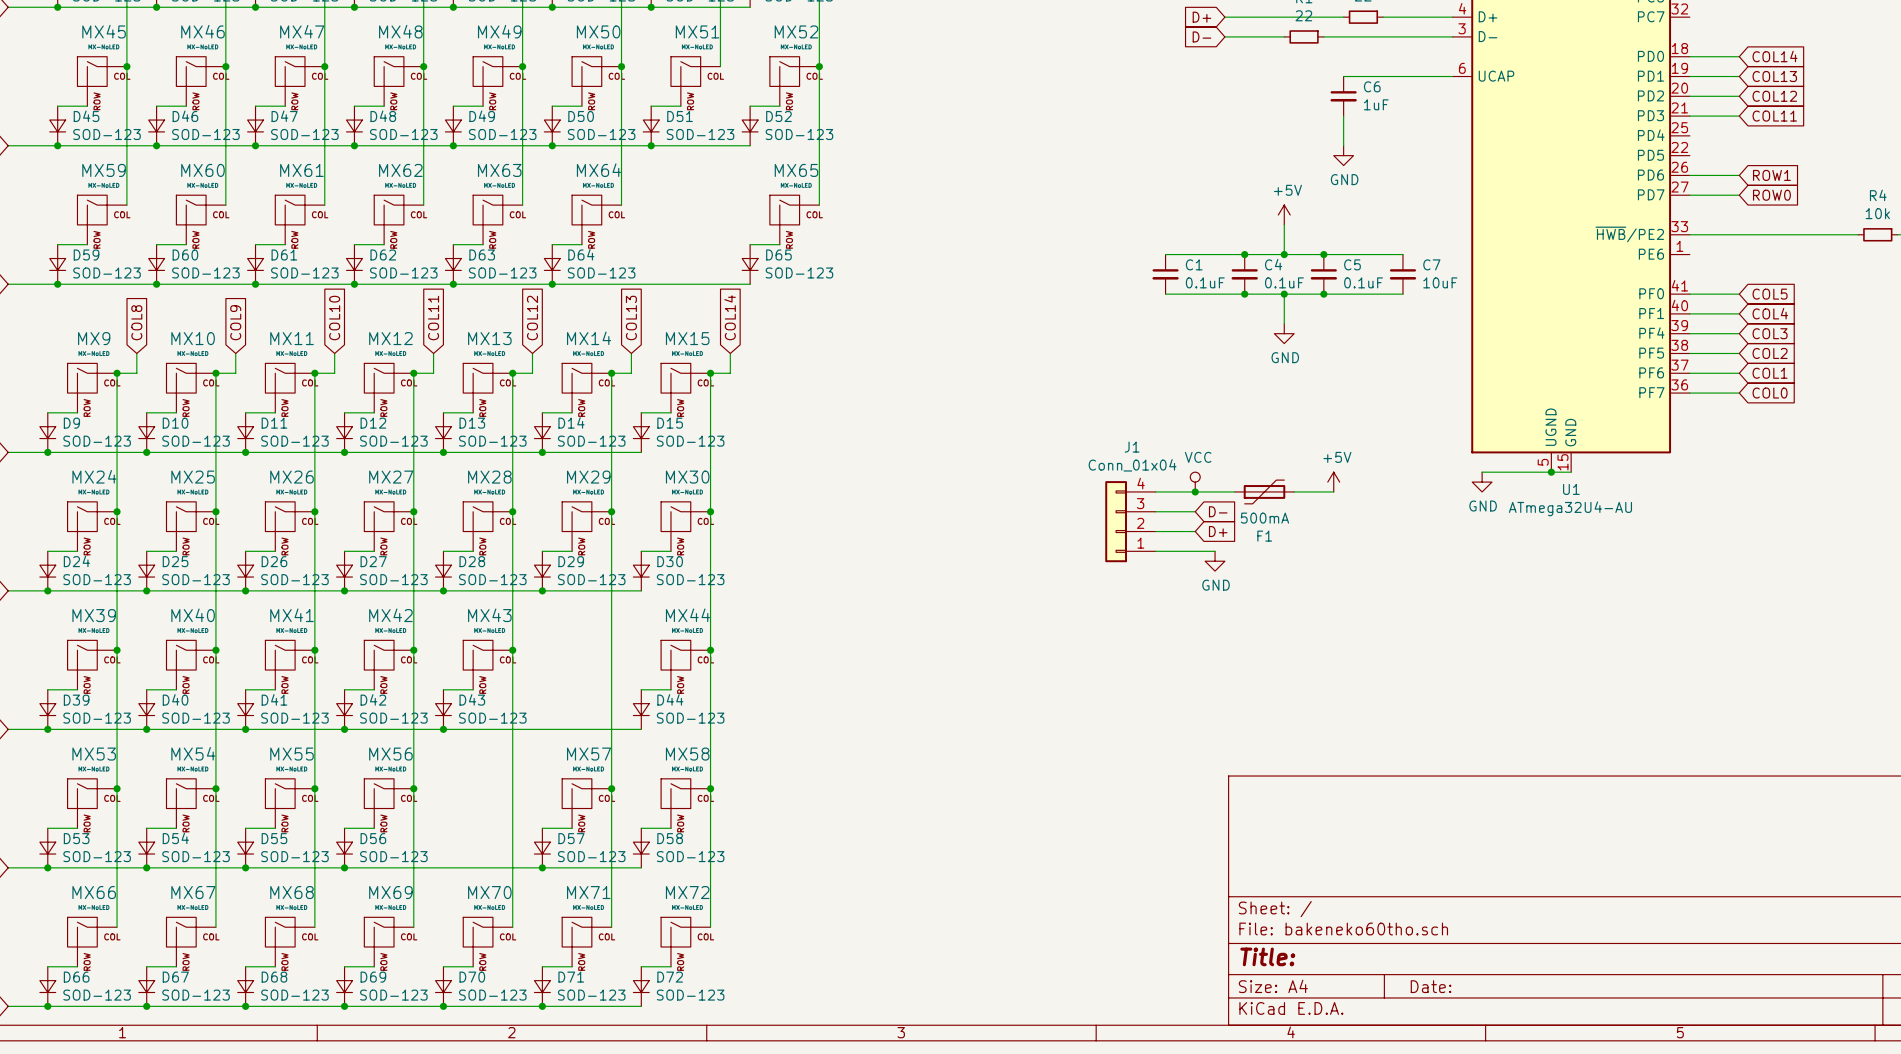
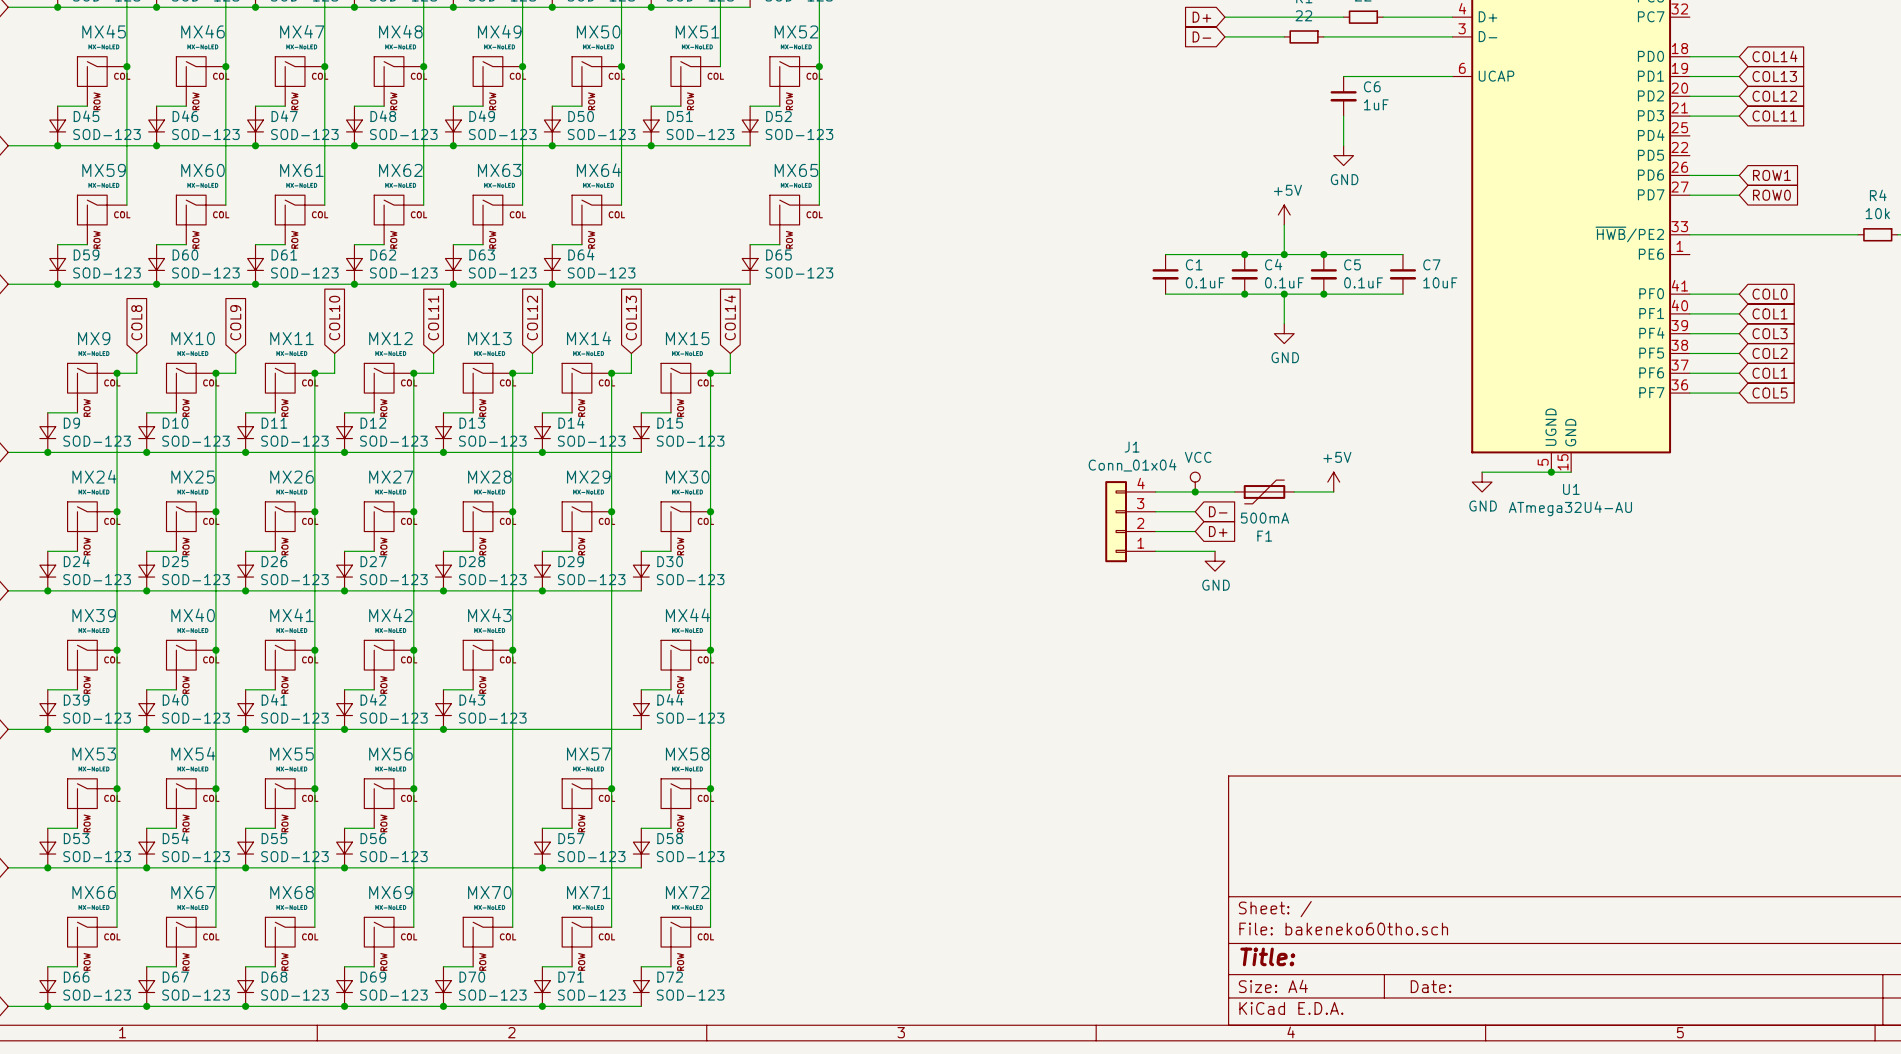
global label: COL5 (1770, 294) -> COL0 (1770, 294)
global label: COL4 (1770, 313) -> COL1 (1770, 313)
global label: COL0 (1770, 393) -> COL5 (1770, 393)

